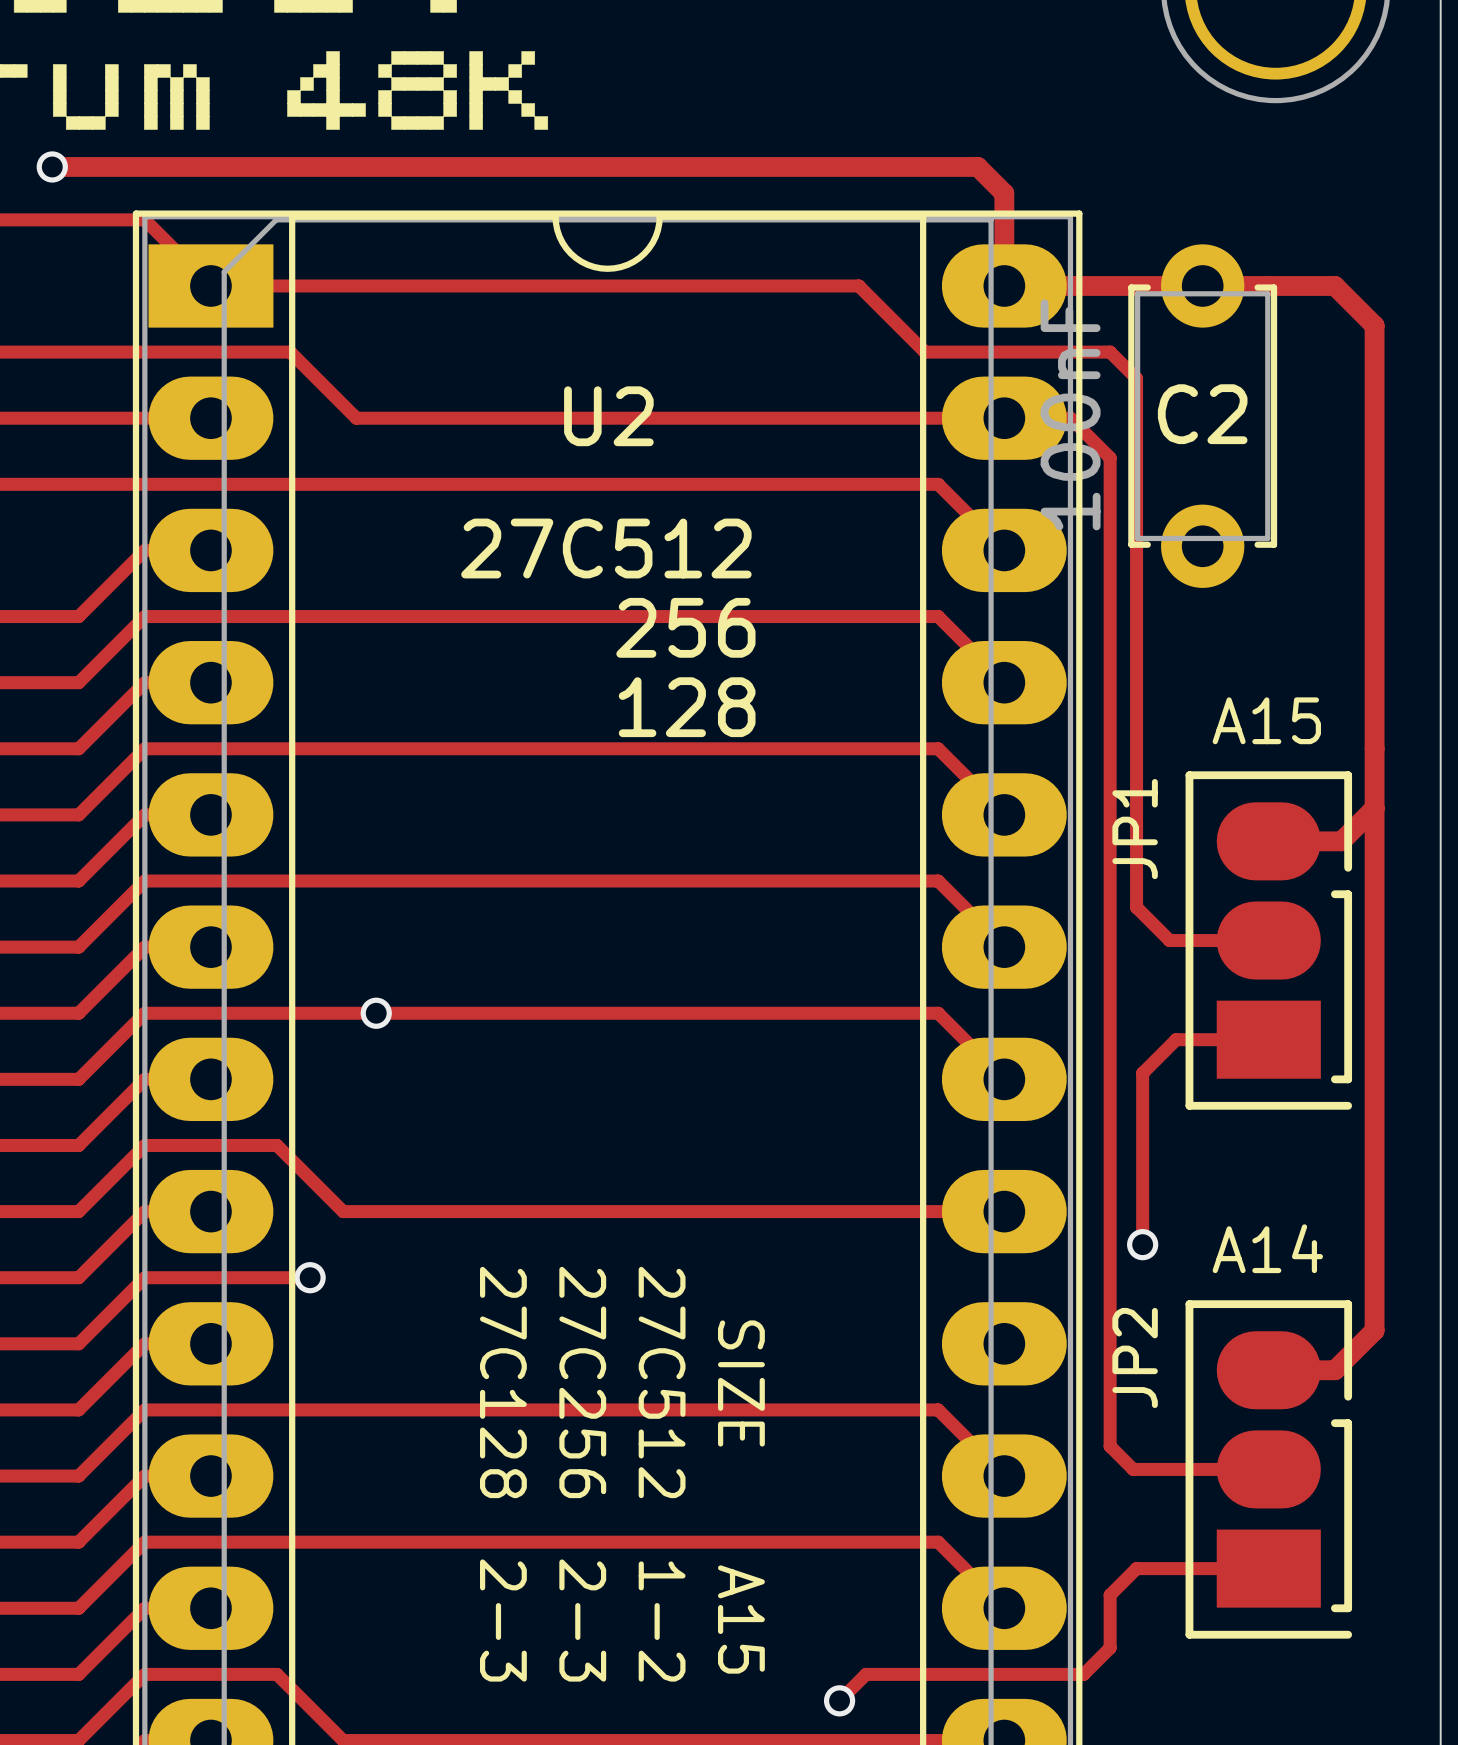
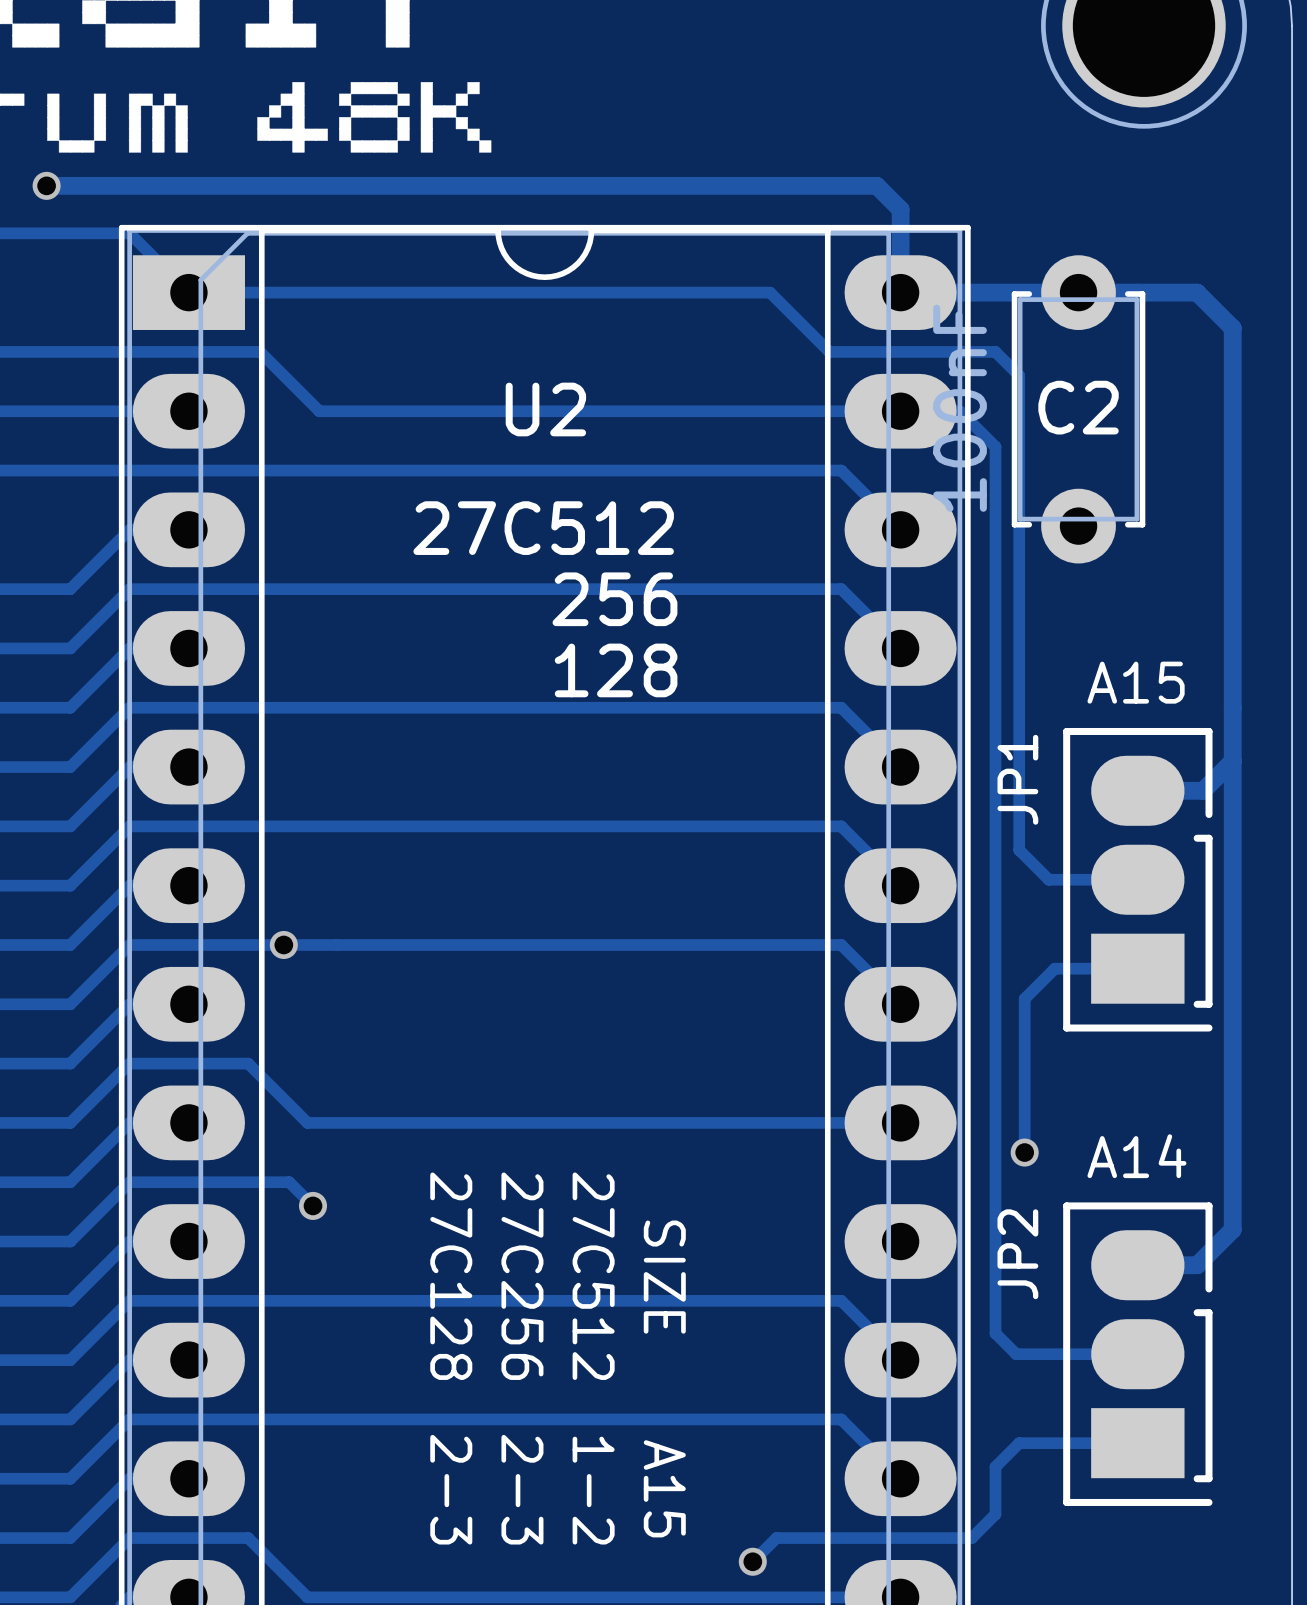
via position: (376, 1013) -> (283, 944)
track: none -> (277, 1182) (289, 1182) (313, 1205)
via position: (310, 1277) -> (313, 1205)

